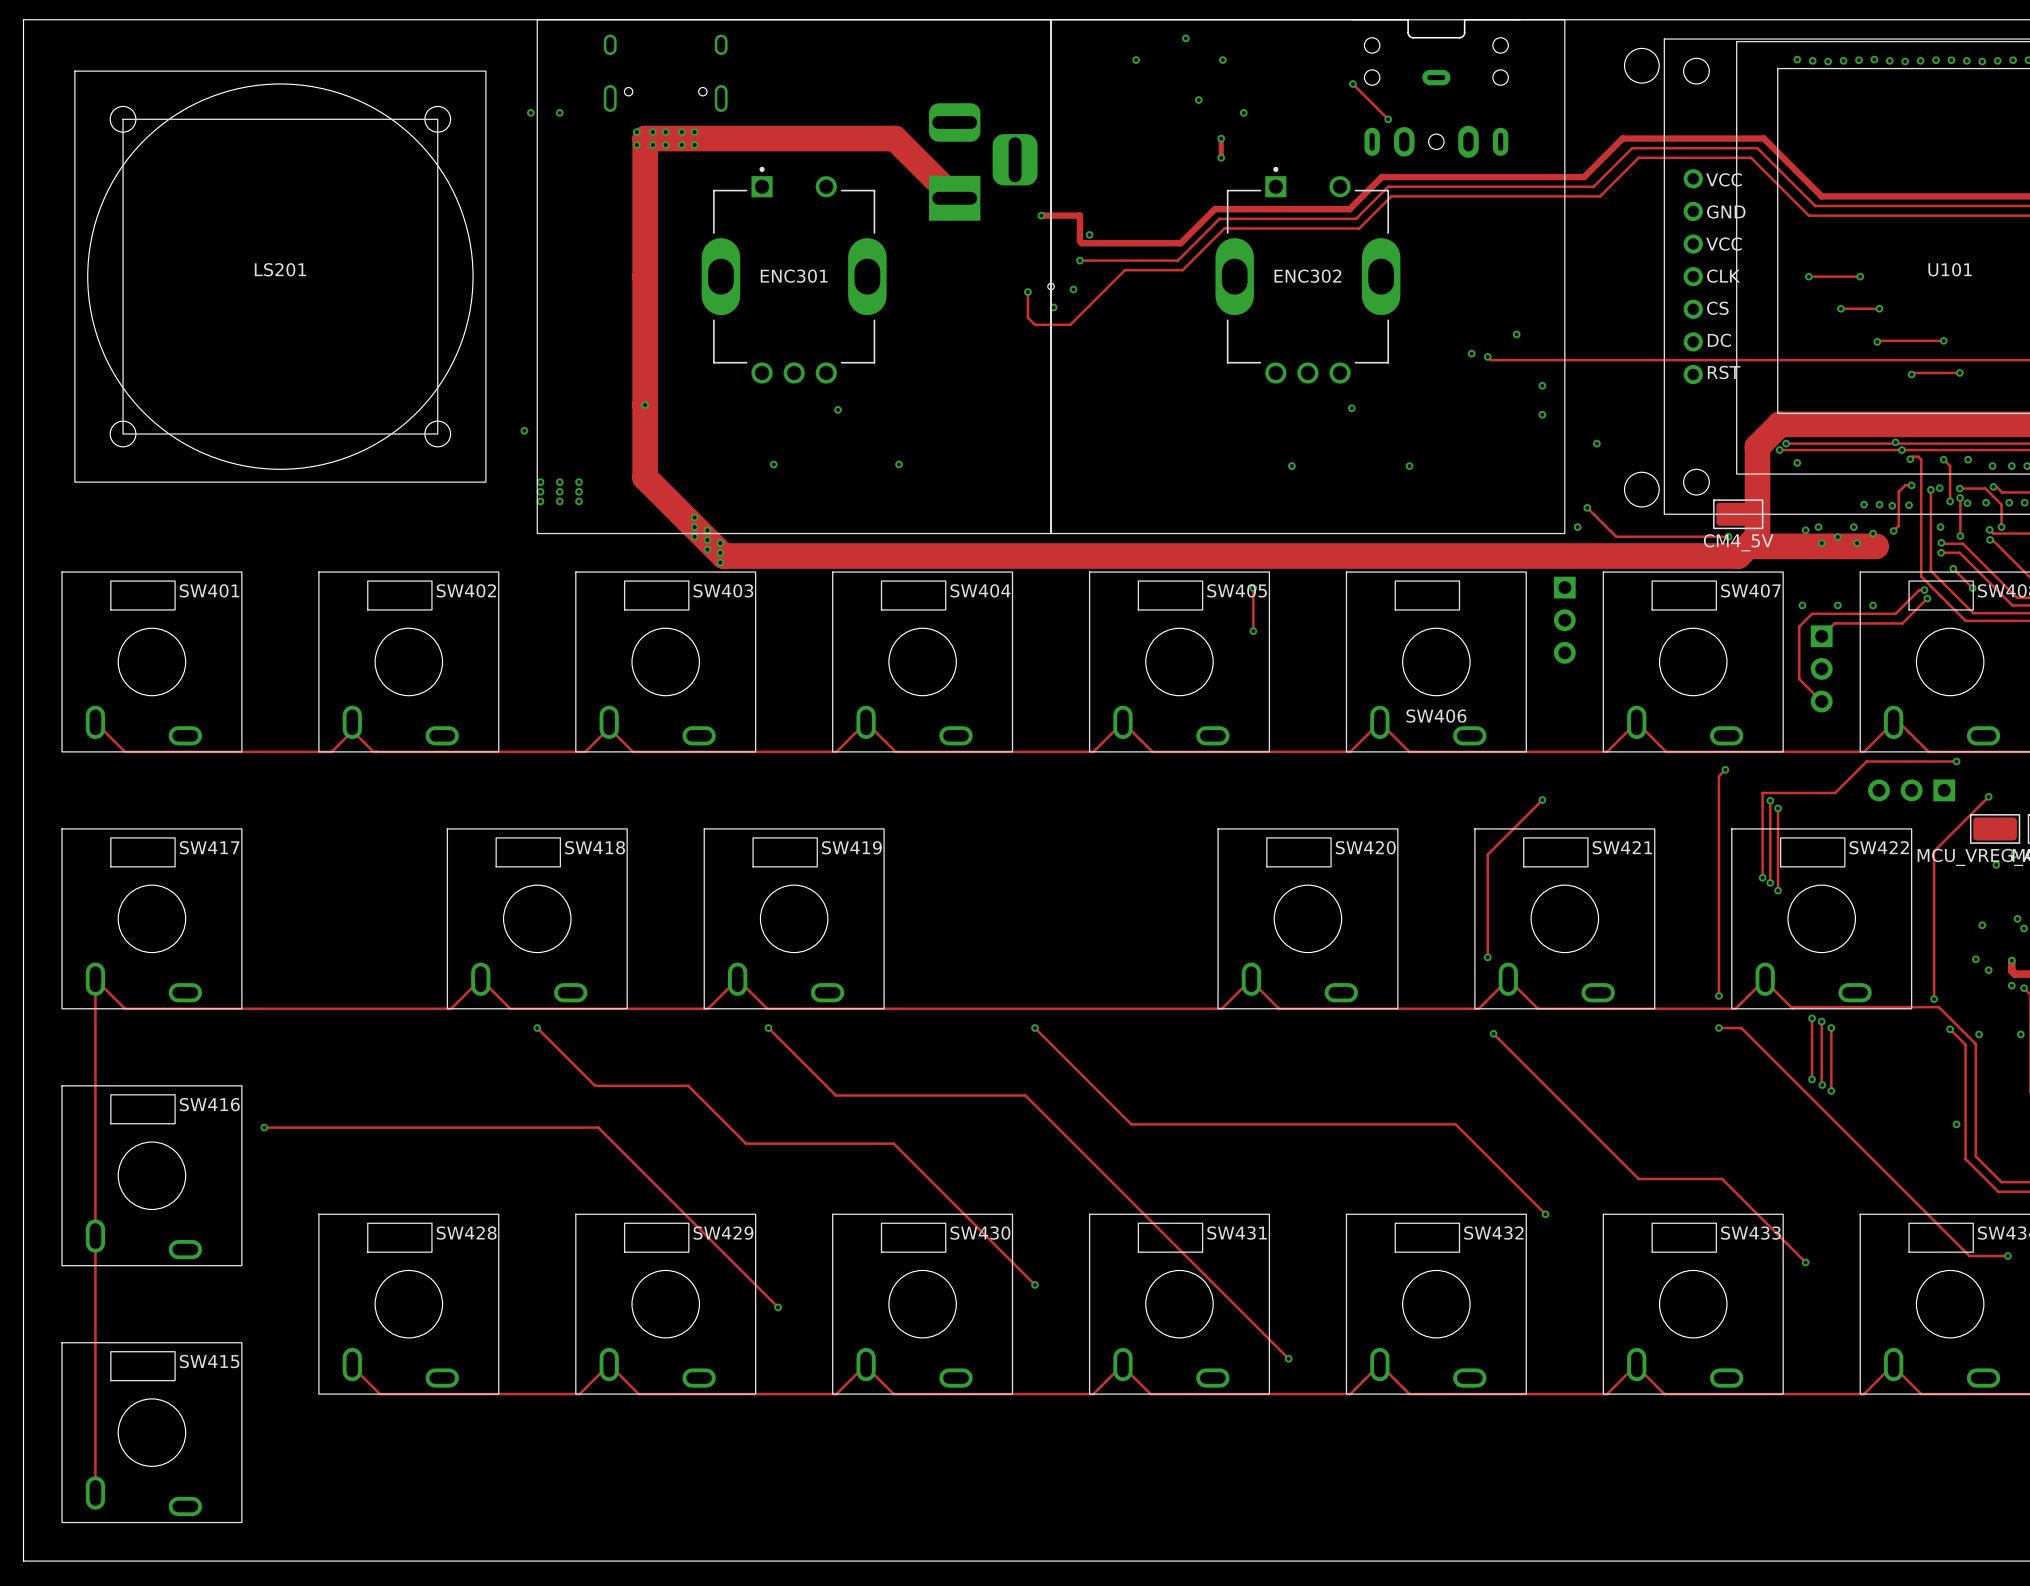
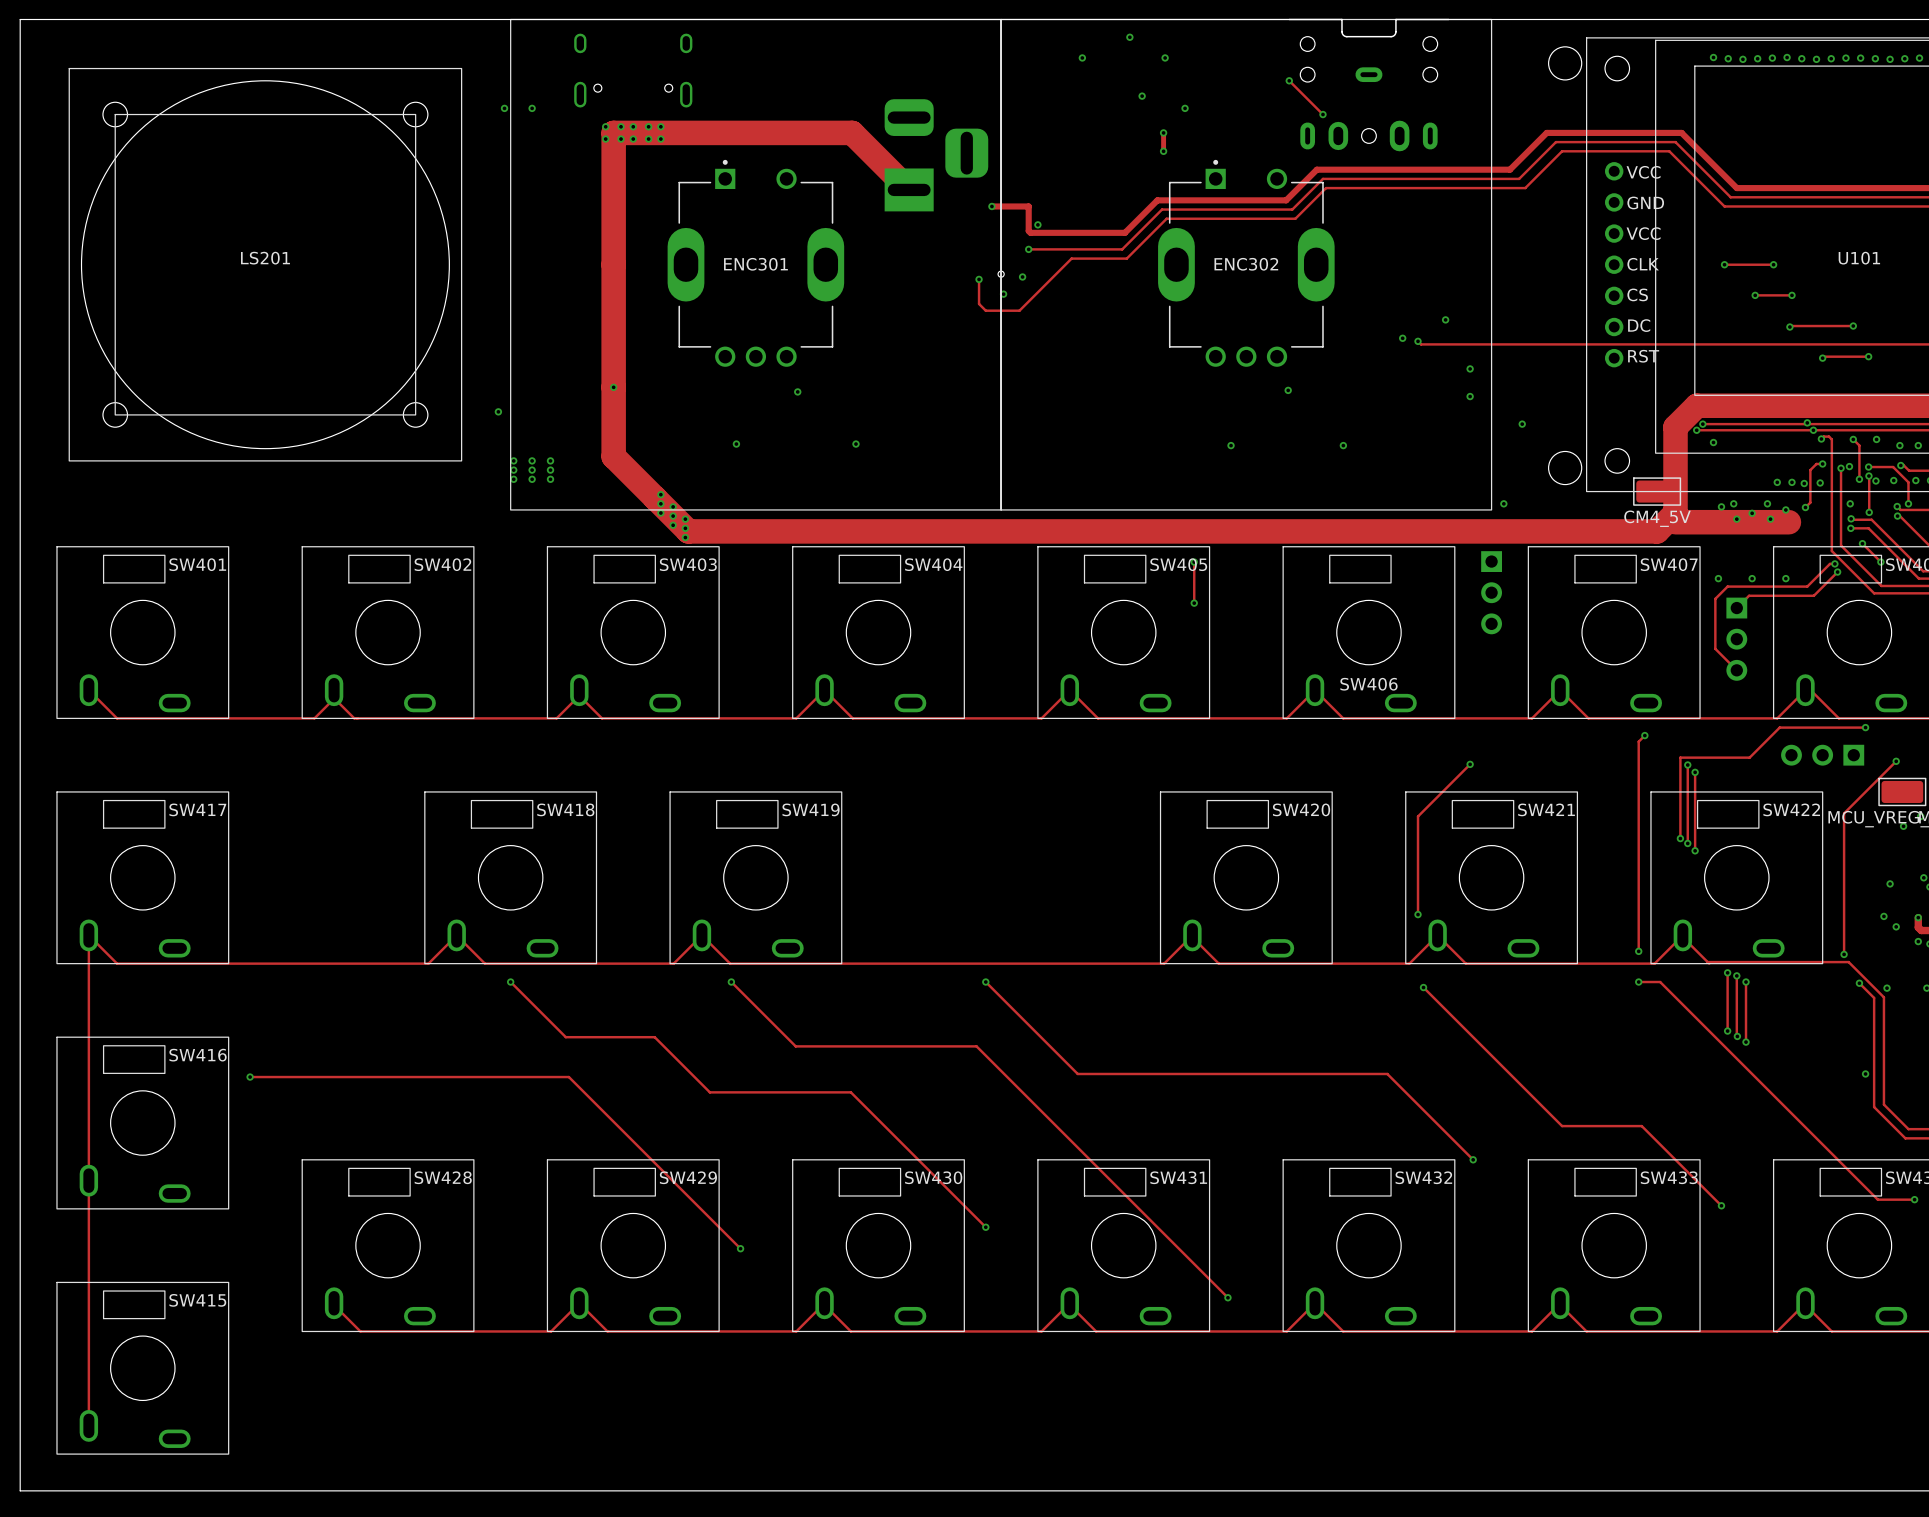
track: (1587, 507) (1616, 536) (1728, 536) -> none
via: (1587, 507) -> none
via: (1728, 536) -> none

